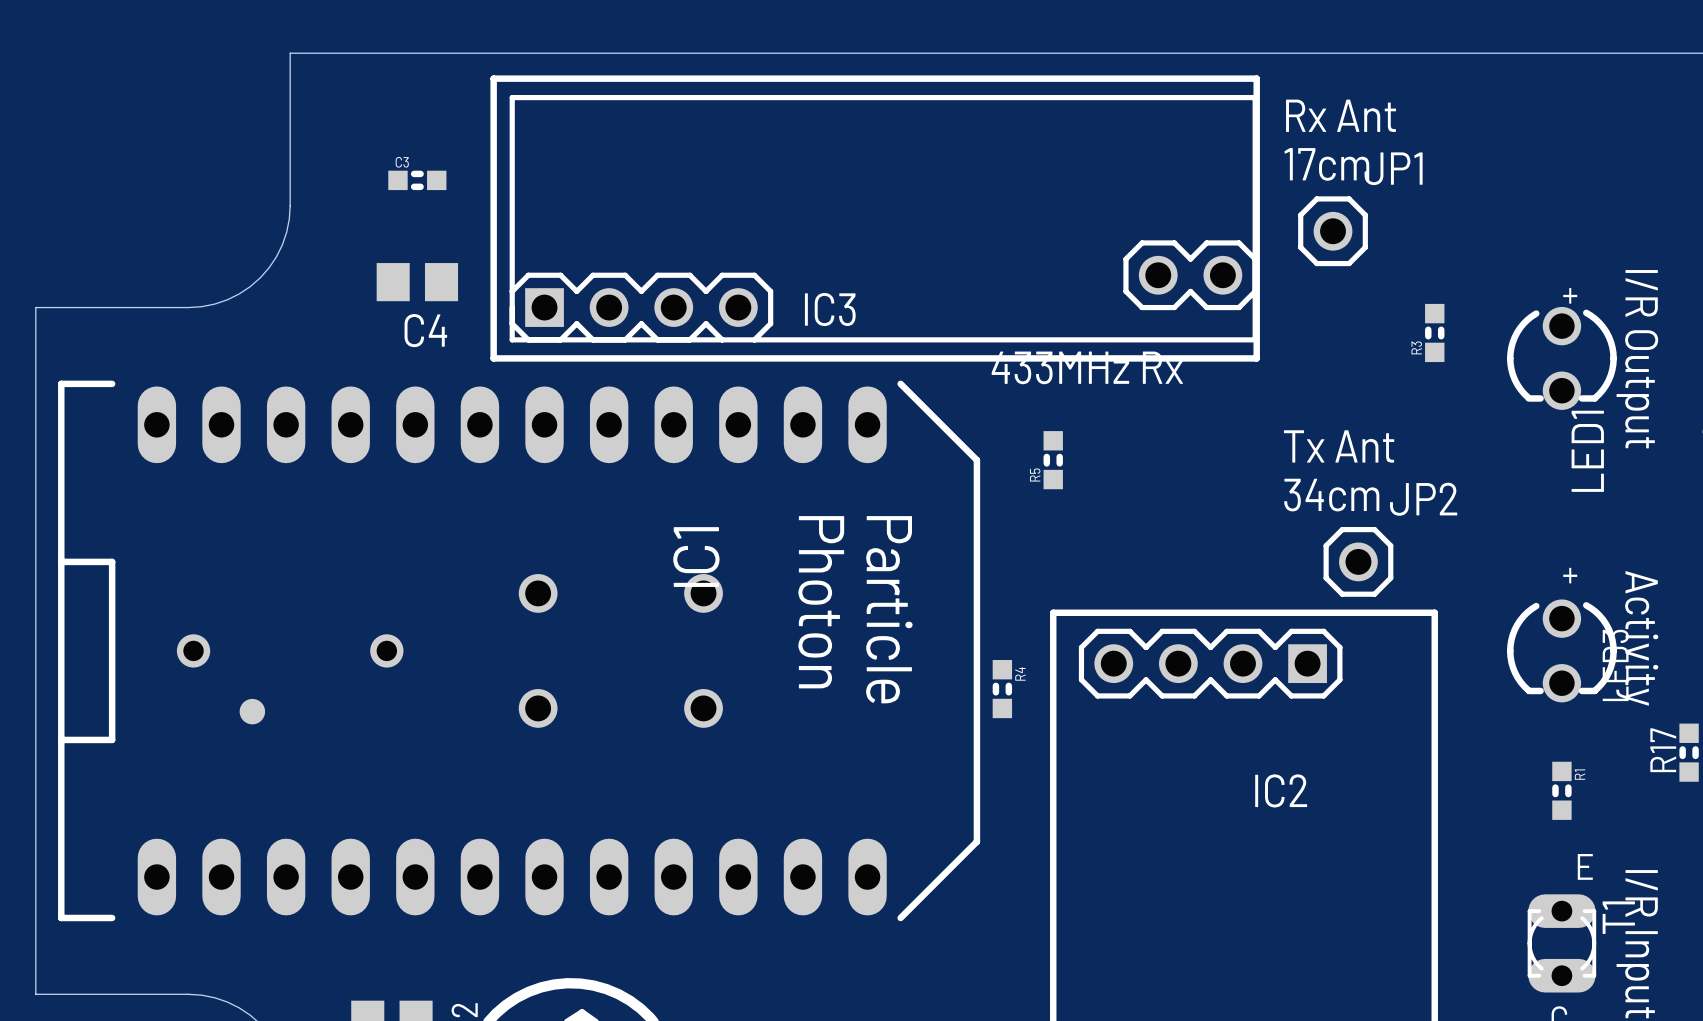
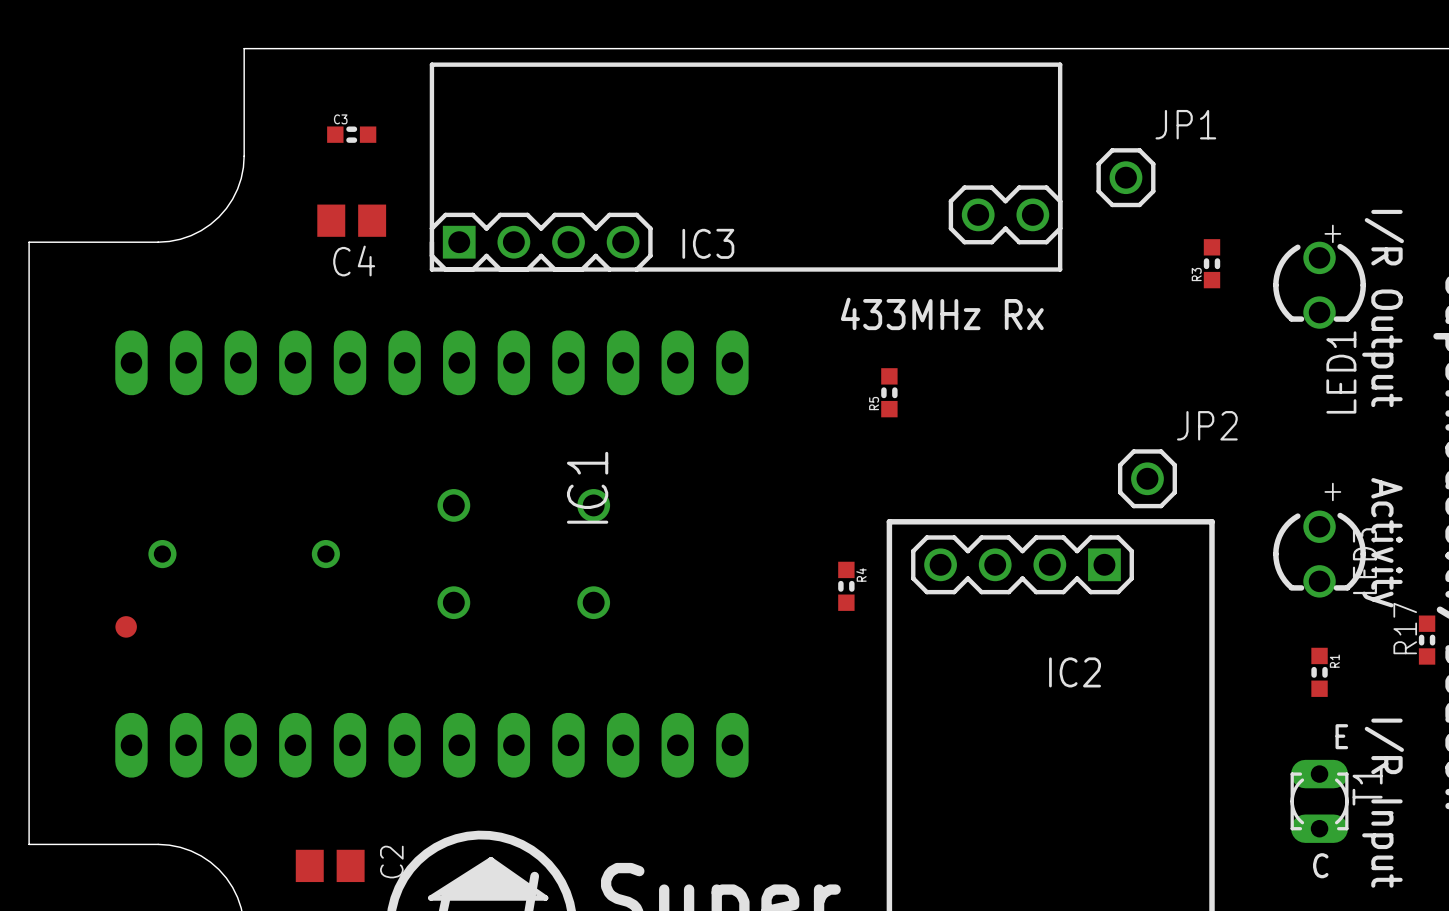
line: (493, 78) (493, 358) (1256, 358) (1256, 78) (493, 78) -> none
text: Rx Ant (1341, 115) -> none
text: 17cm (1326, 164) -> none
board edge: (290, 180) (289, 219) (282, 244) (269, 267) (260, 277) (239, 293) (214, 304) (201, 306) (35, 307) -> (244, 156) (241, 178) (232, 199) (218, 217) (201, 230) (169, 241) (29, 242) (29, 263)
C3 position: (417, 180) -> (351, 134)
IC3 position: (883, 218) -> (746, 167)
JP1 position: (1333, 231) -> (1125, 177)
C4 position: (417, 282) -> (351, 220)
text position: + (1570, 295) -> + (1332, 233)
R3 position: (1434, 332) -> (1212, 263)
LED1 position: (1561, 358) -> (1319, 285)
line: (112, 383) (61, 383) (61, 917) (112, 917) -> none
line: (900, 383) (976, 460) (976, 841) (900, 917) -> none
text: Tx Ant (1339, 446) -> none
text: 34cm (1331, 495) -> none
line: (61, 561) (112, 561) (112, 739) (61, 739) -> none
text: Photon (821, 602) -> none
text: Particle (889, 609) -> none
part position: (252, 711) -> (126, 626)

